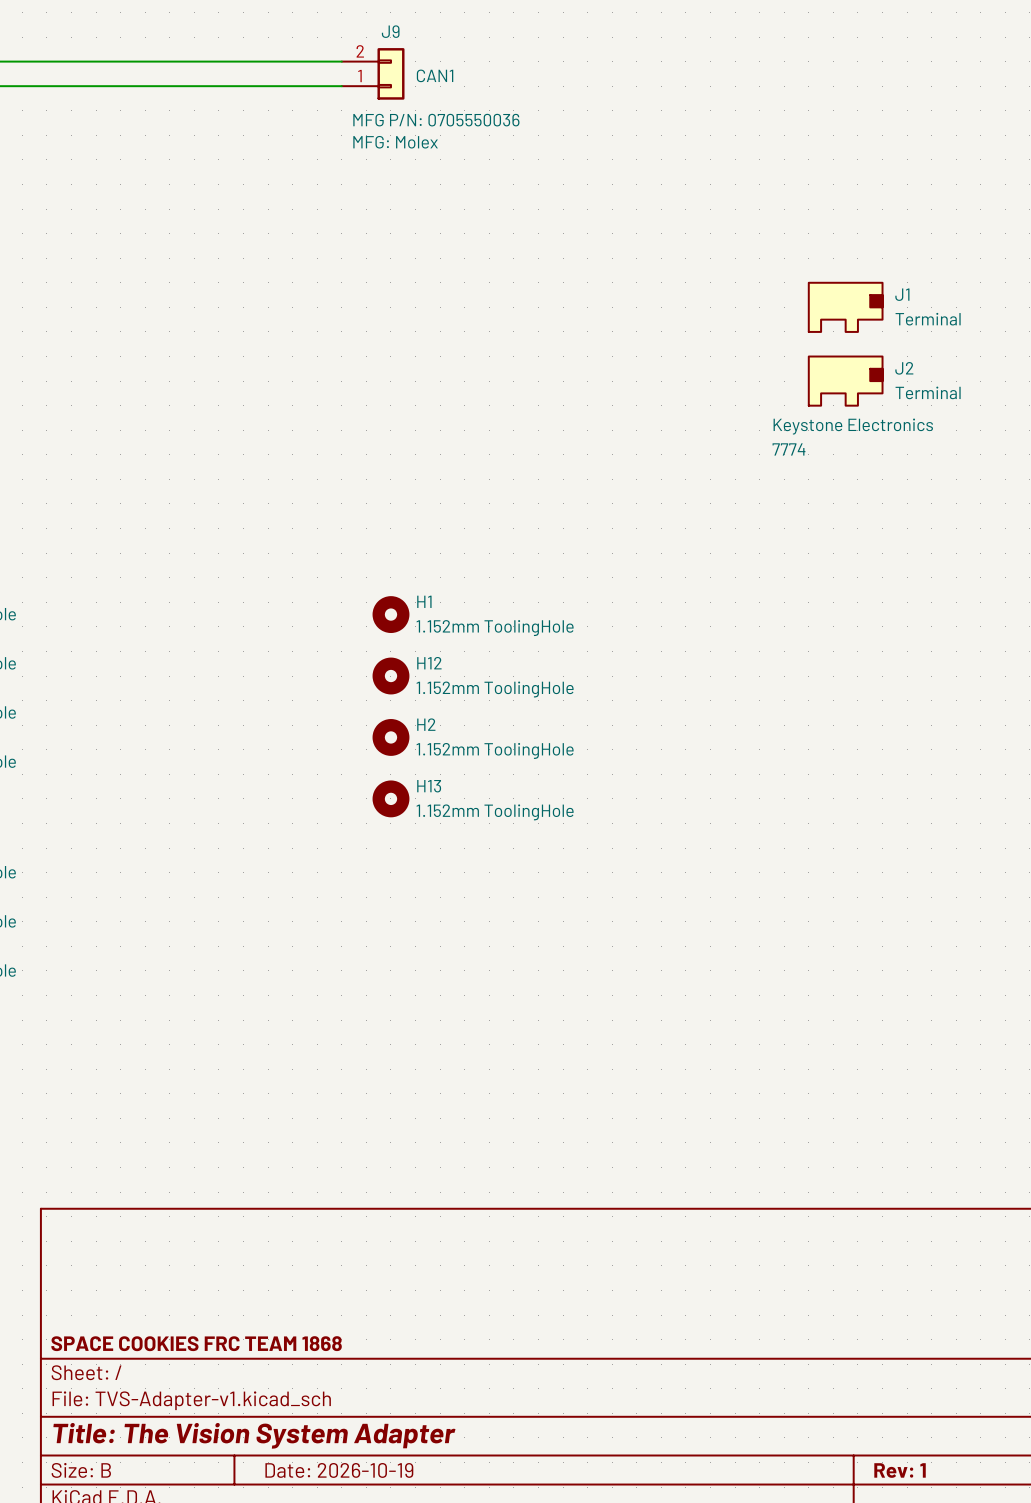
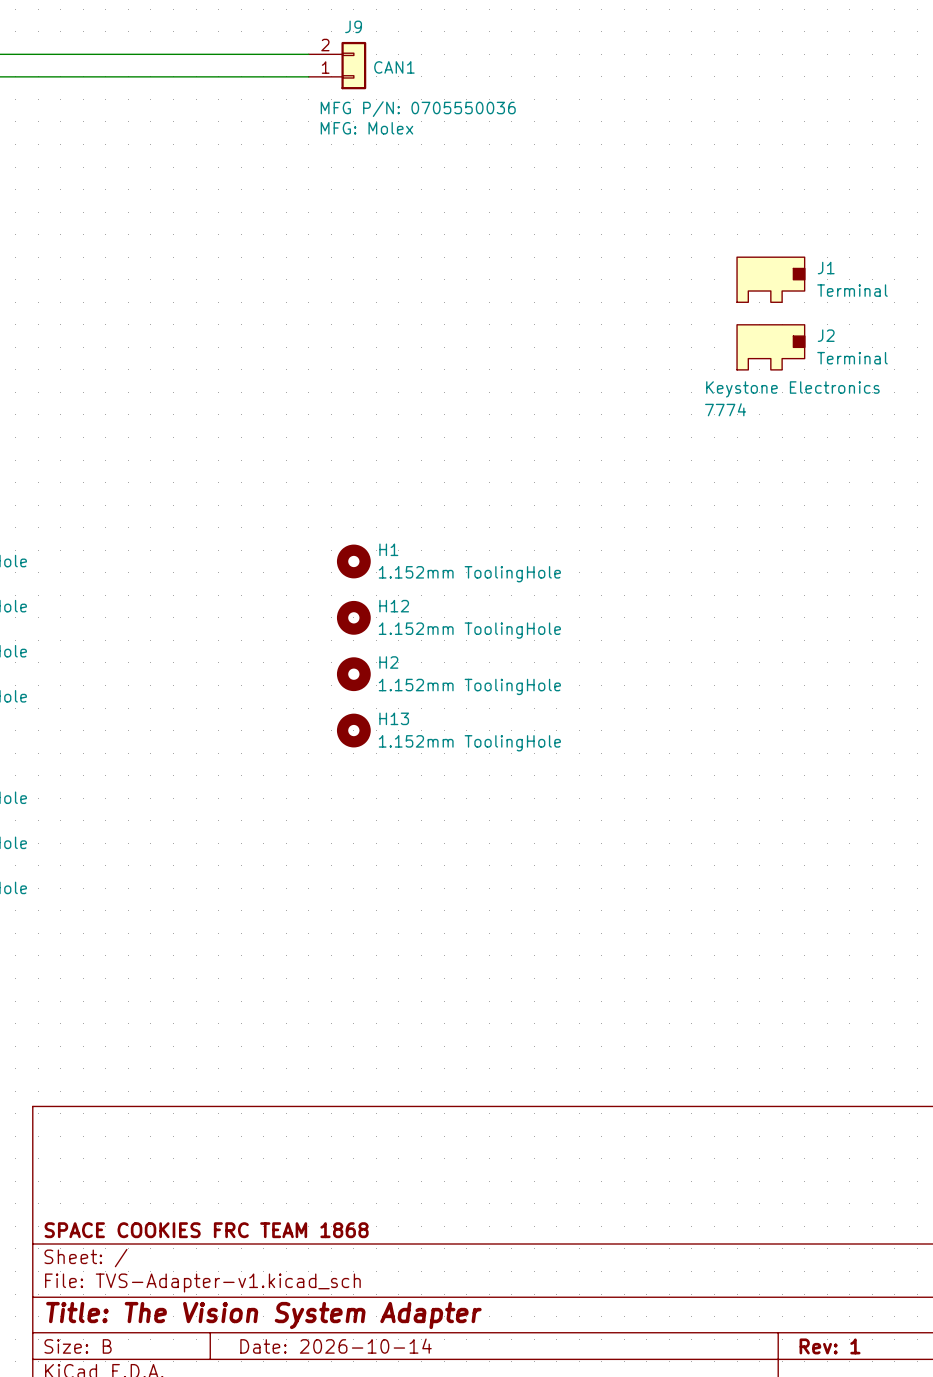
title block: Date: 2026-10-19 (339, 1470) -> Date: 2026-10-14 (336, 1346)

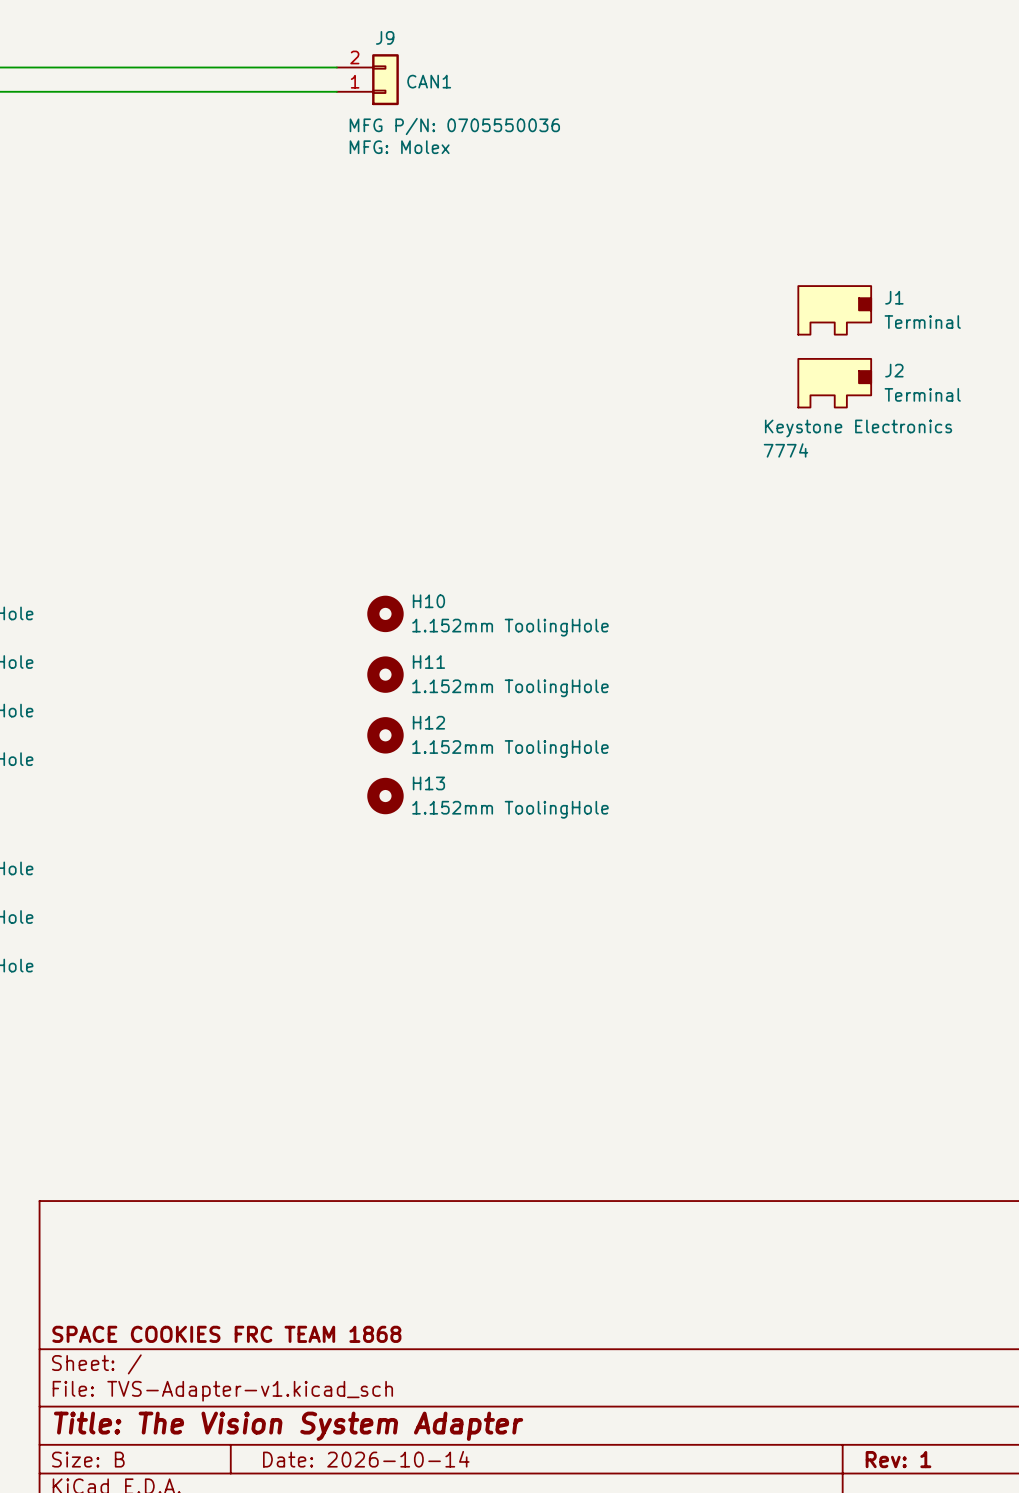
H1 name: H1 (388, 549) -> H10 (428, 601)
H12 name: H12 (394, 606) -> H11 (428, 662)
H2 name: H2 (388, 662) -> H12 (428, 722)

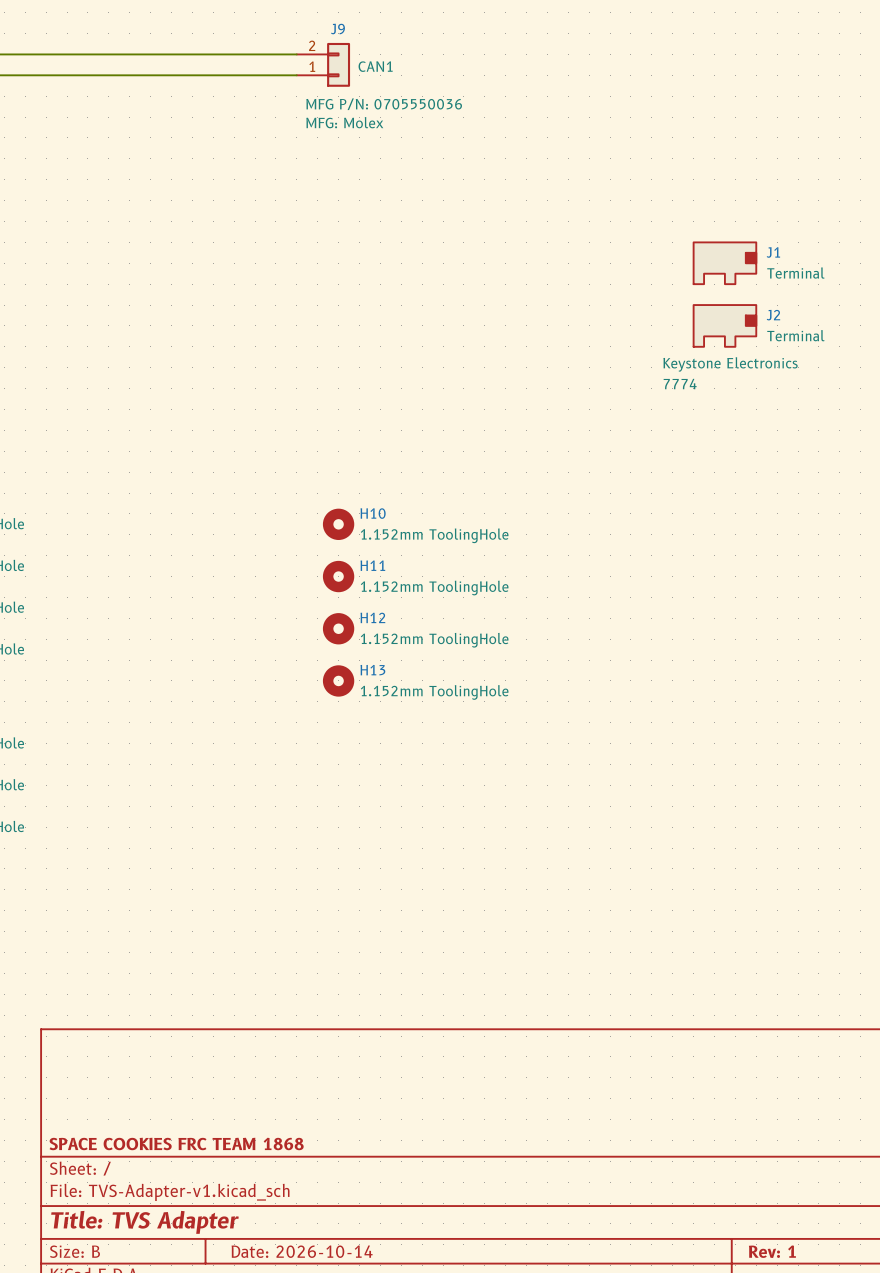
title block: Title: The Vision System Adapter (288, 1426) -> Title: TVS Adapter (144, 1222)

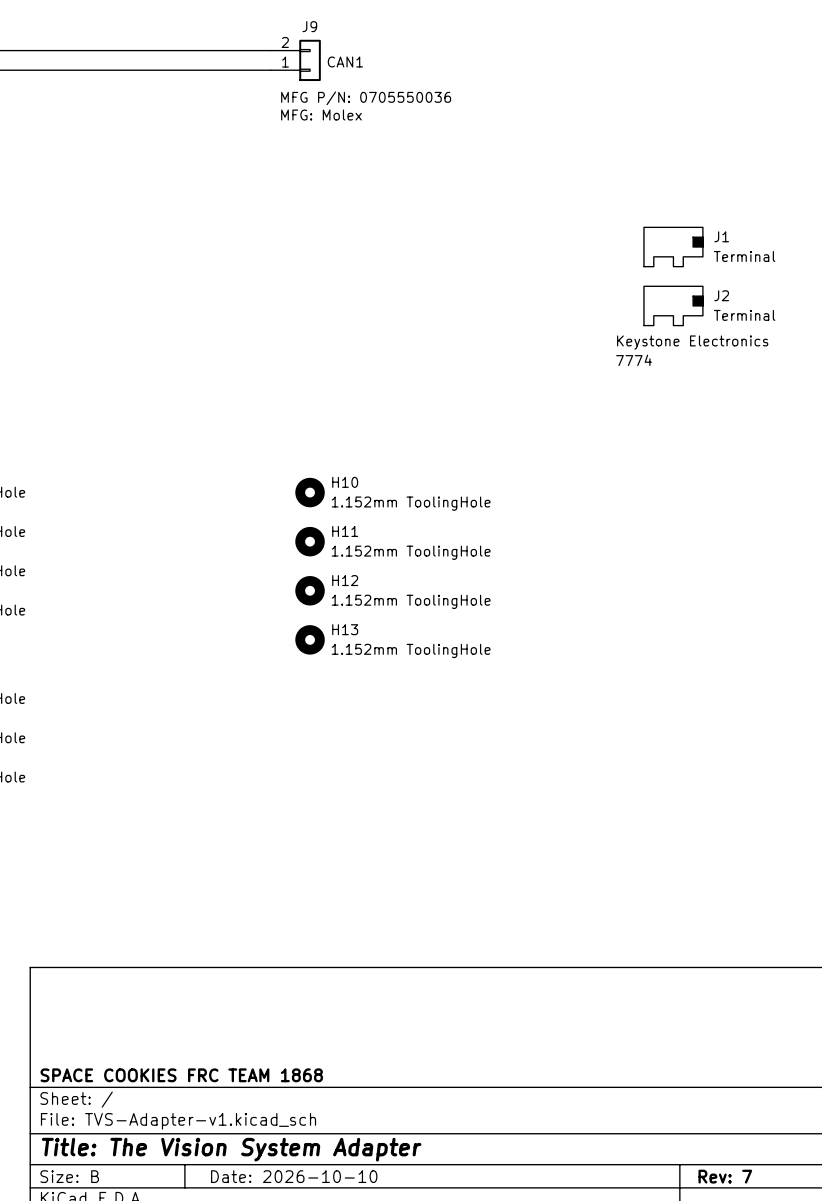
title block: Title: TVS Adapter (144, 1222) -> Title: The Vision System Adapter (231, 1149)
title block: Date: 2026-10-14 (302, 1251) -> Date: 2026-10-10 (294, 1176)
title block: Rev: 1 (772, 1251) -> Rev: 7 (725, 1176)

